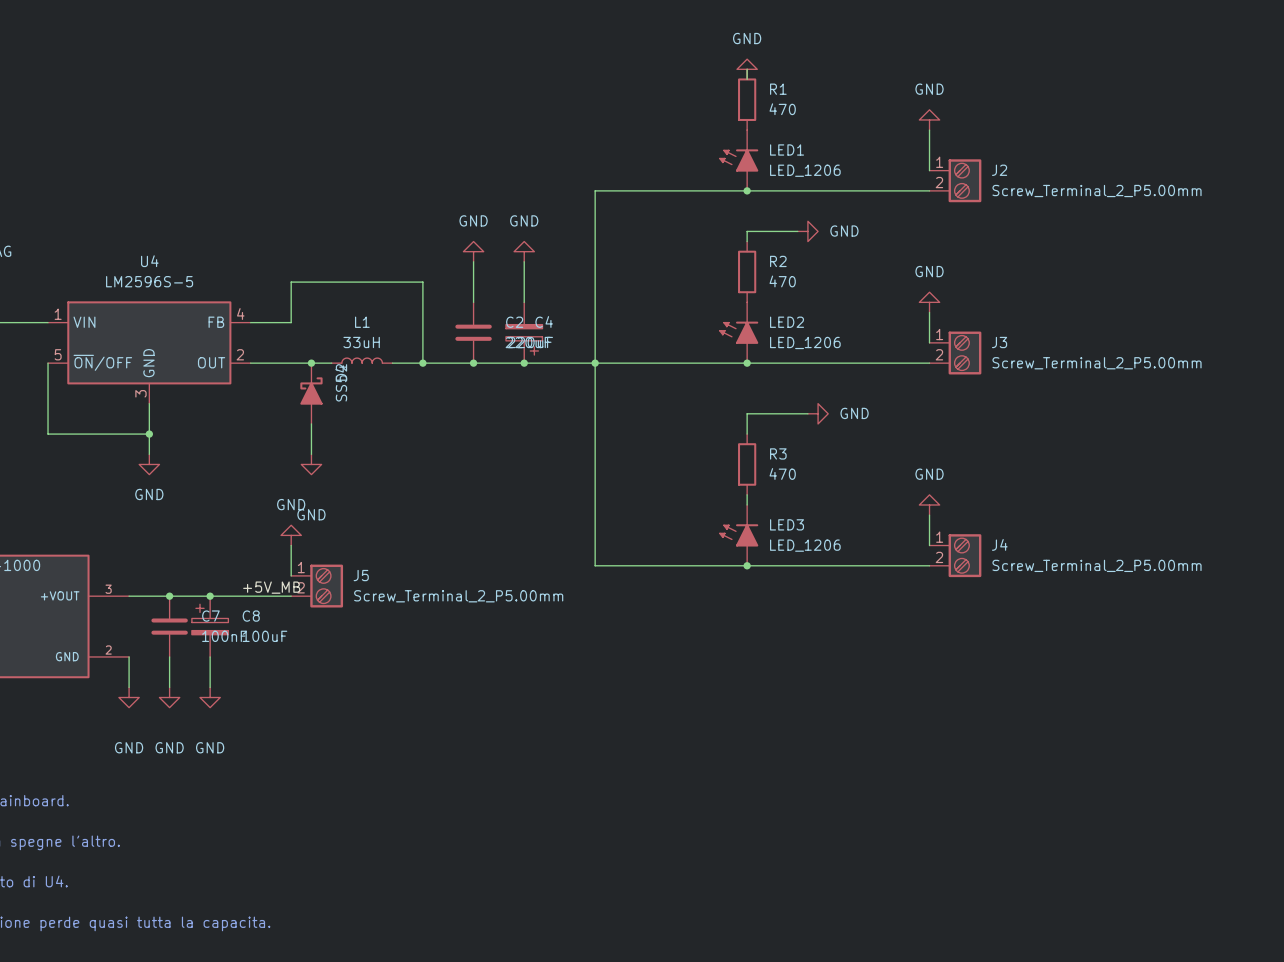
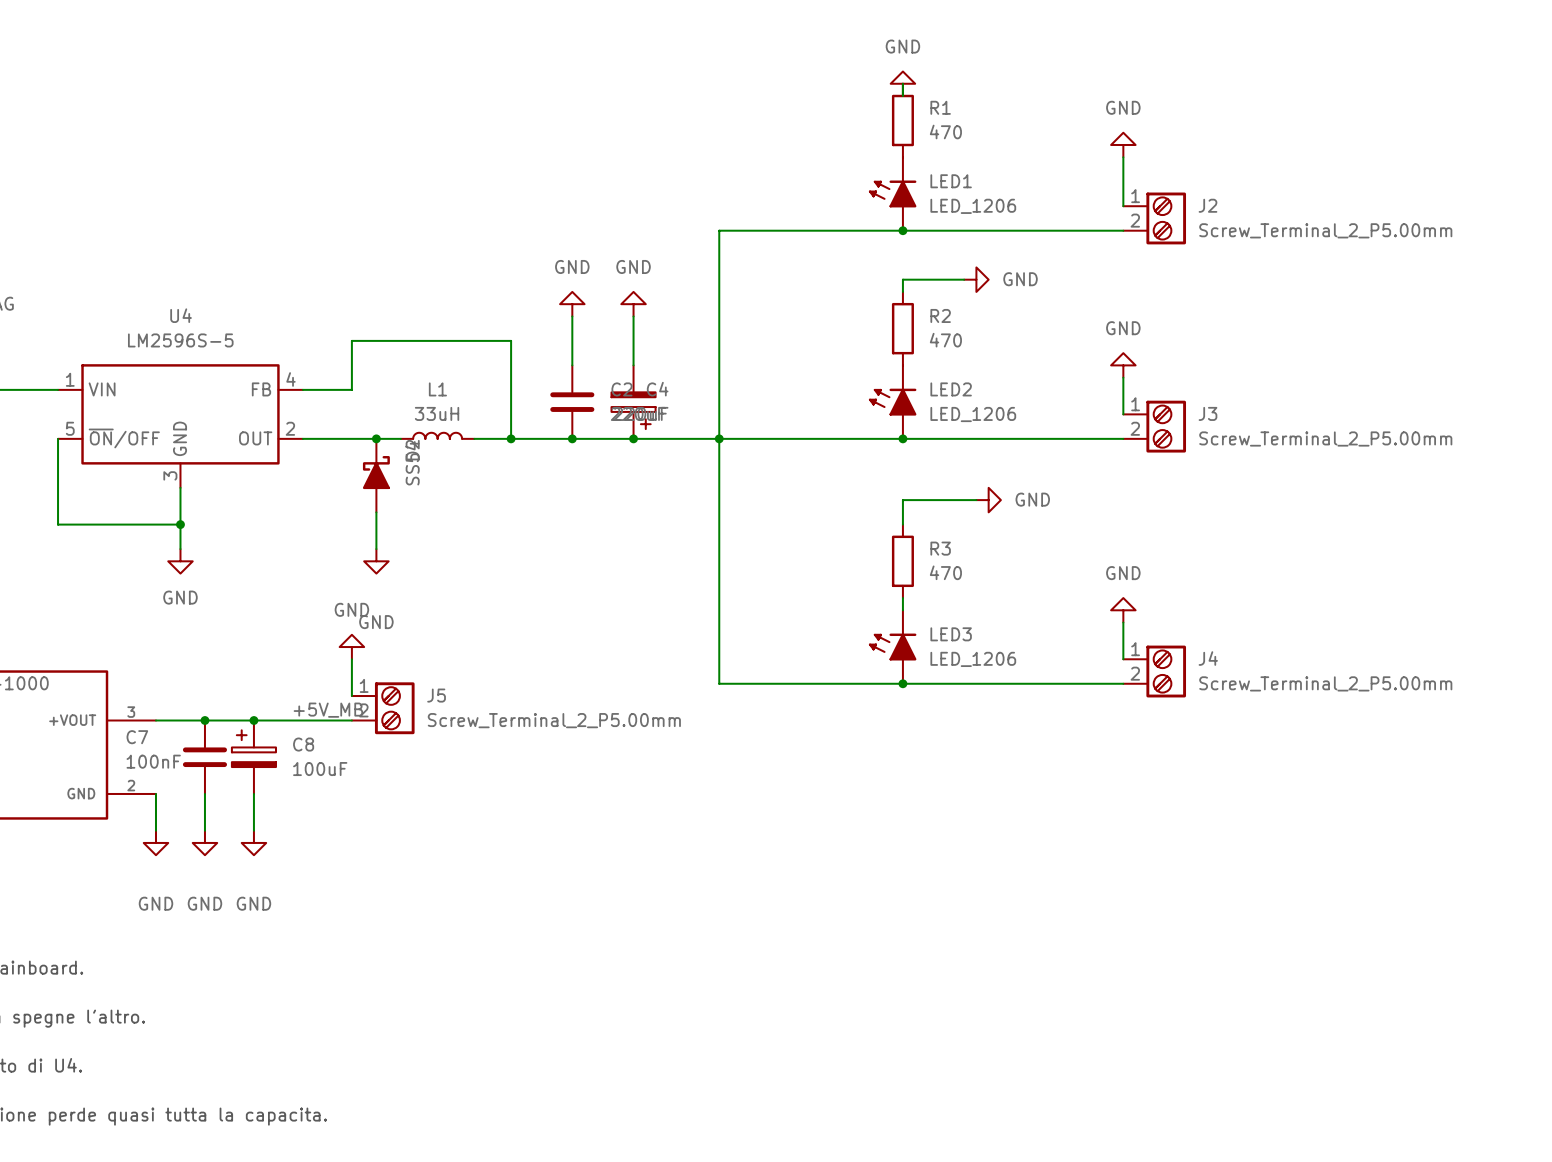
C7 name position: C7 (210, 616) -> C7 (137, 737)
C7 value position: 100nF (224, 636) -> 100nF (153, 761)

